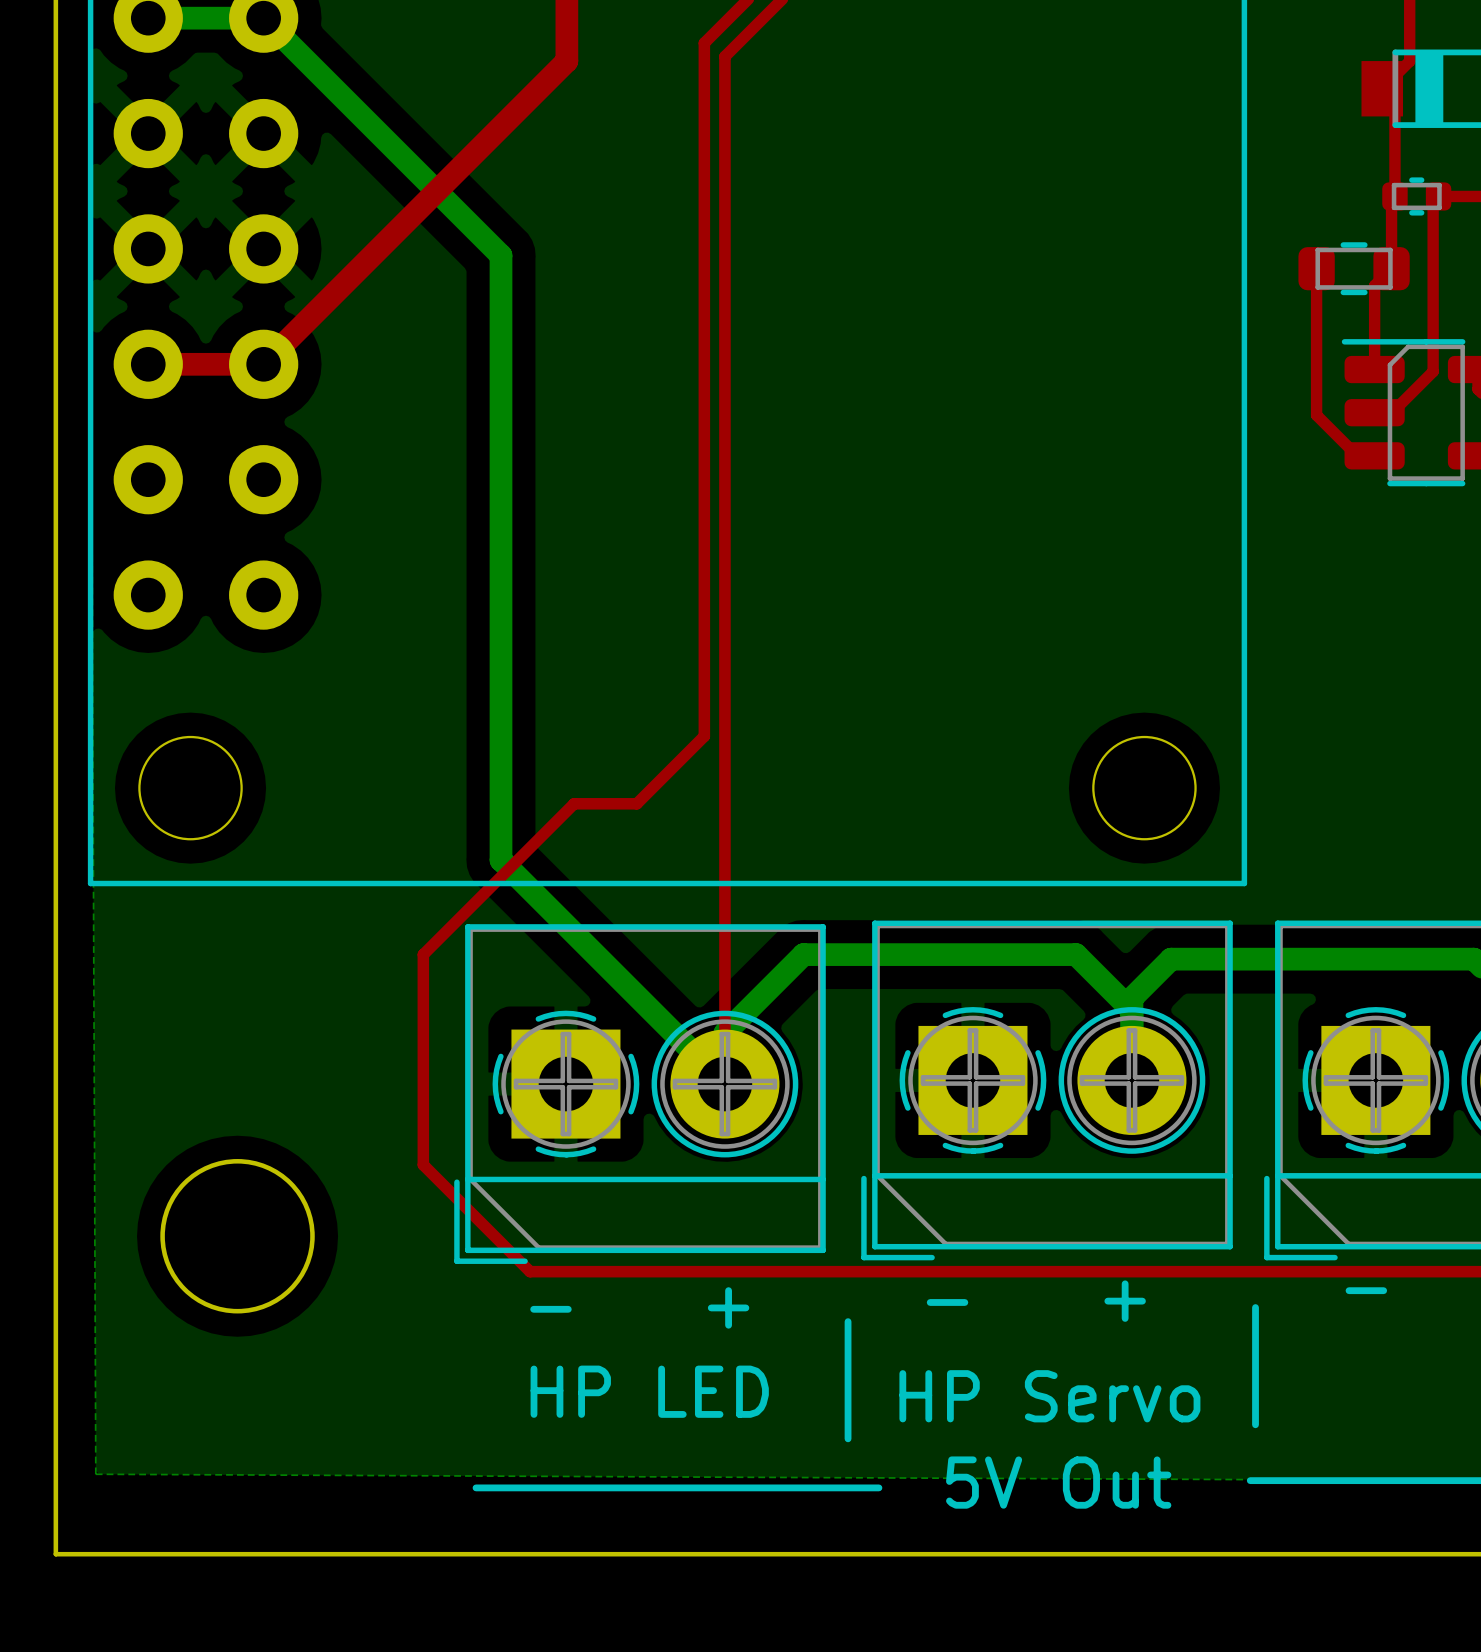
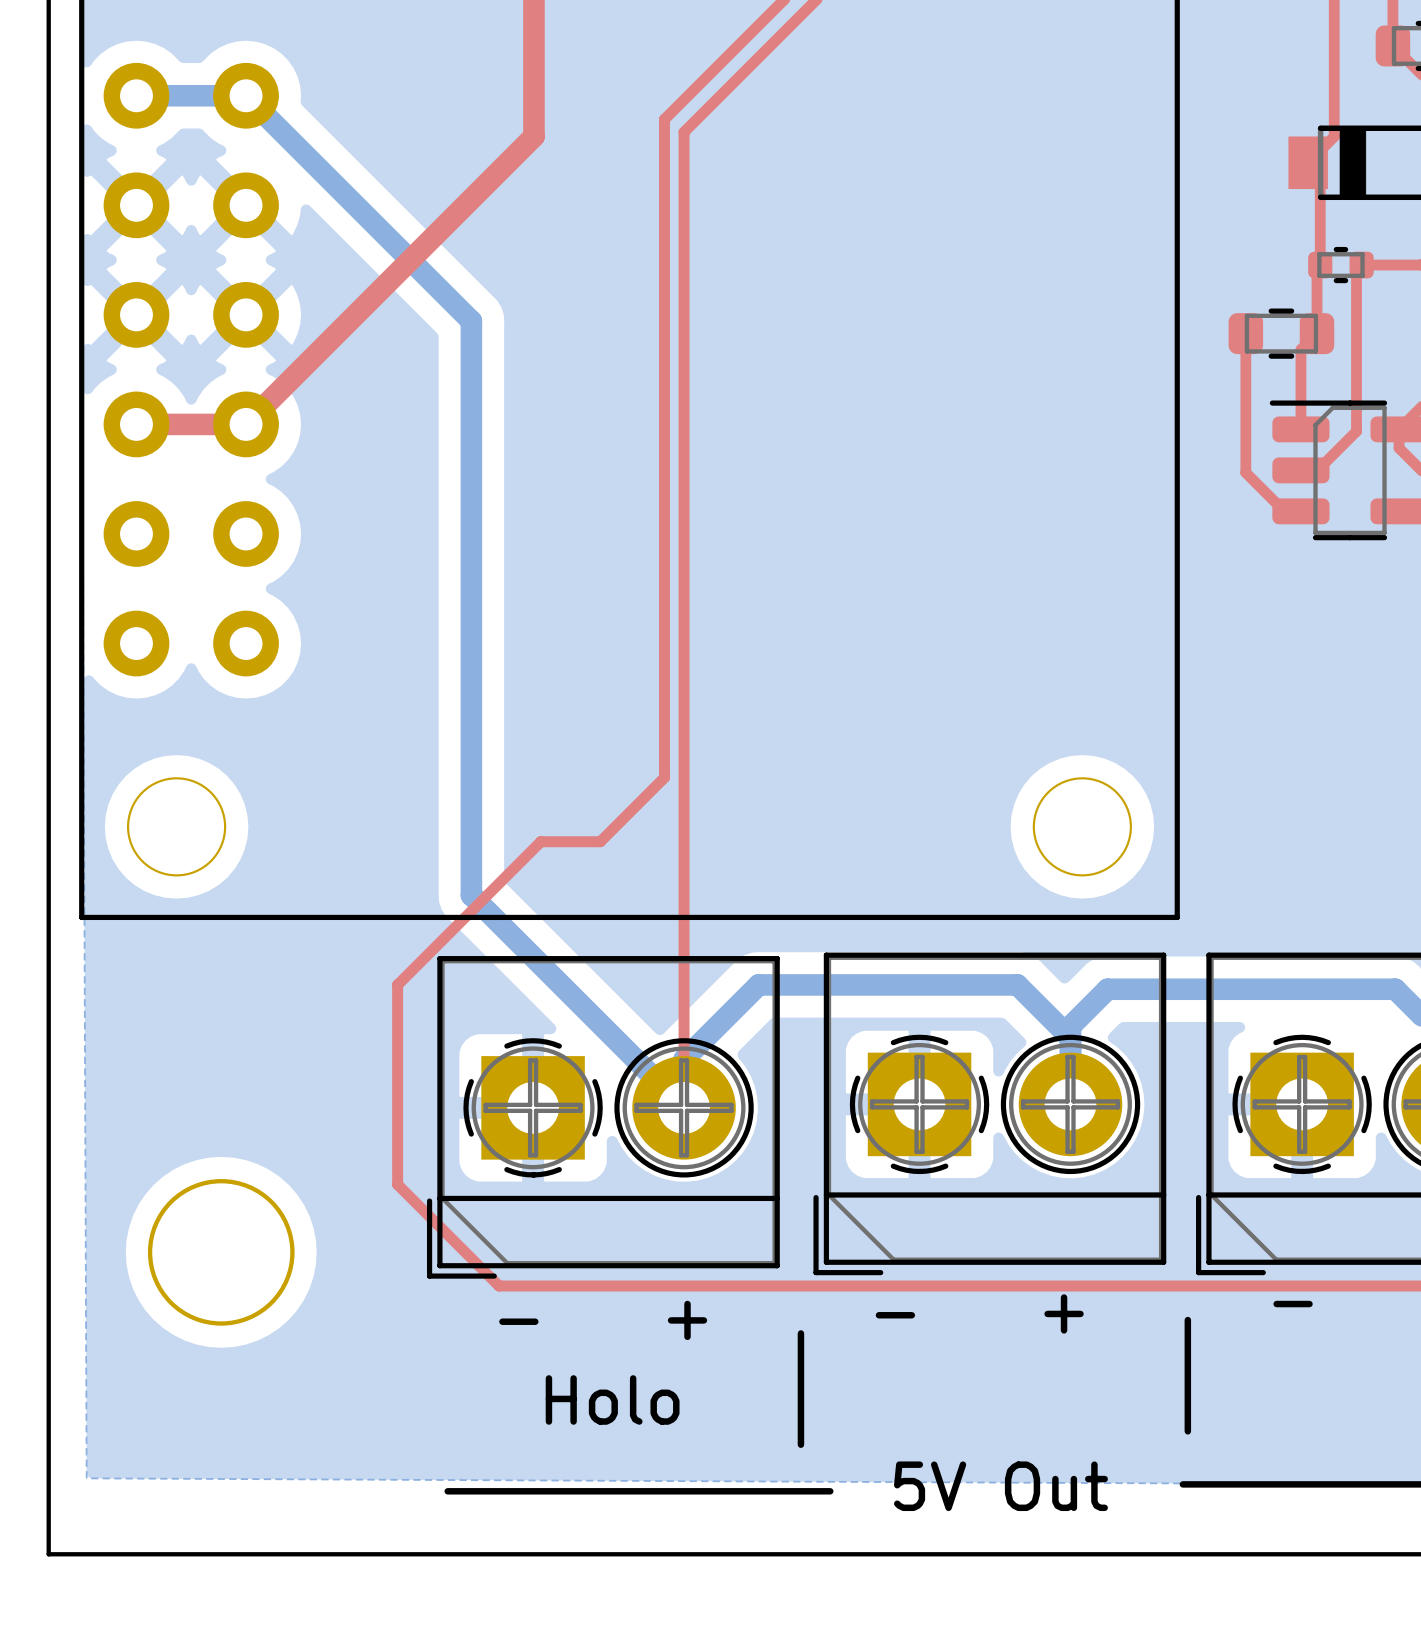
text: HP LED (649, 1391) -> Holo (612, 1399)
text: HP Servo (1049, 1396) -> none

